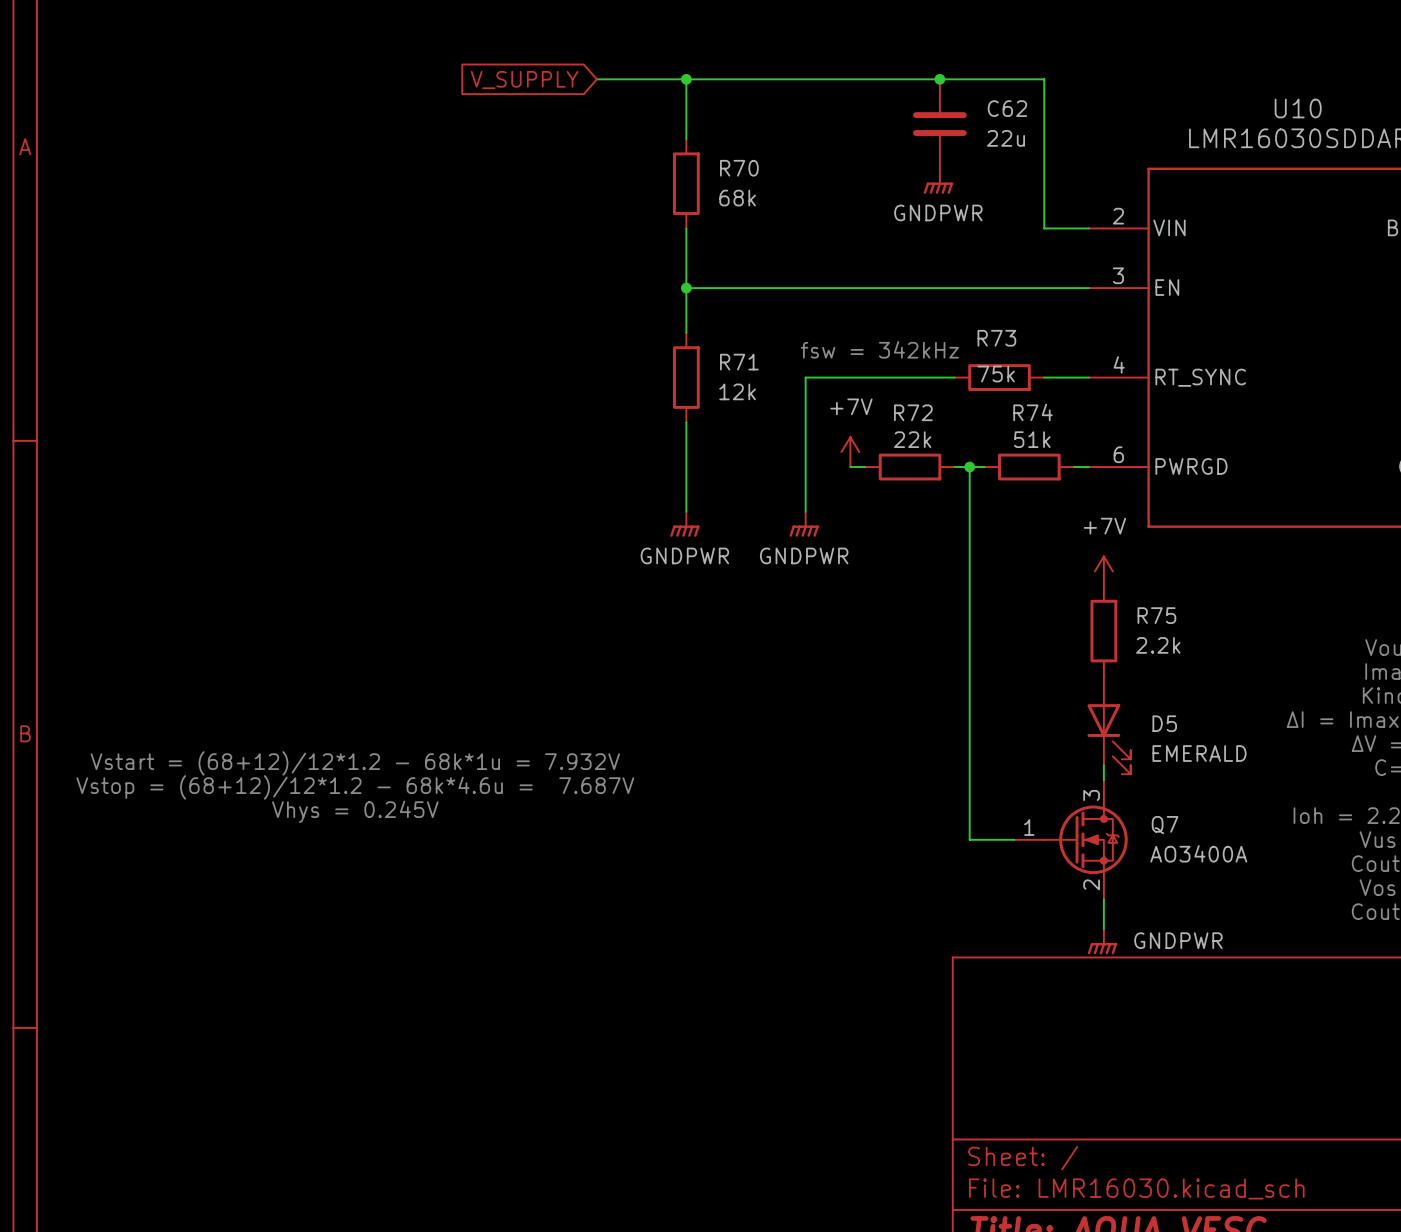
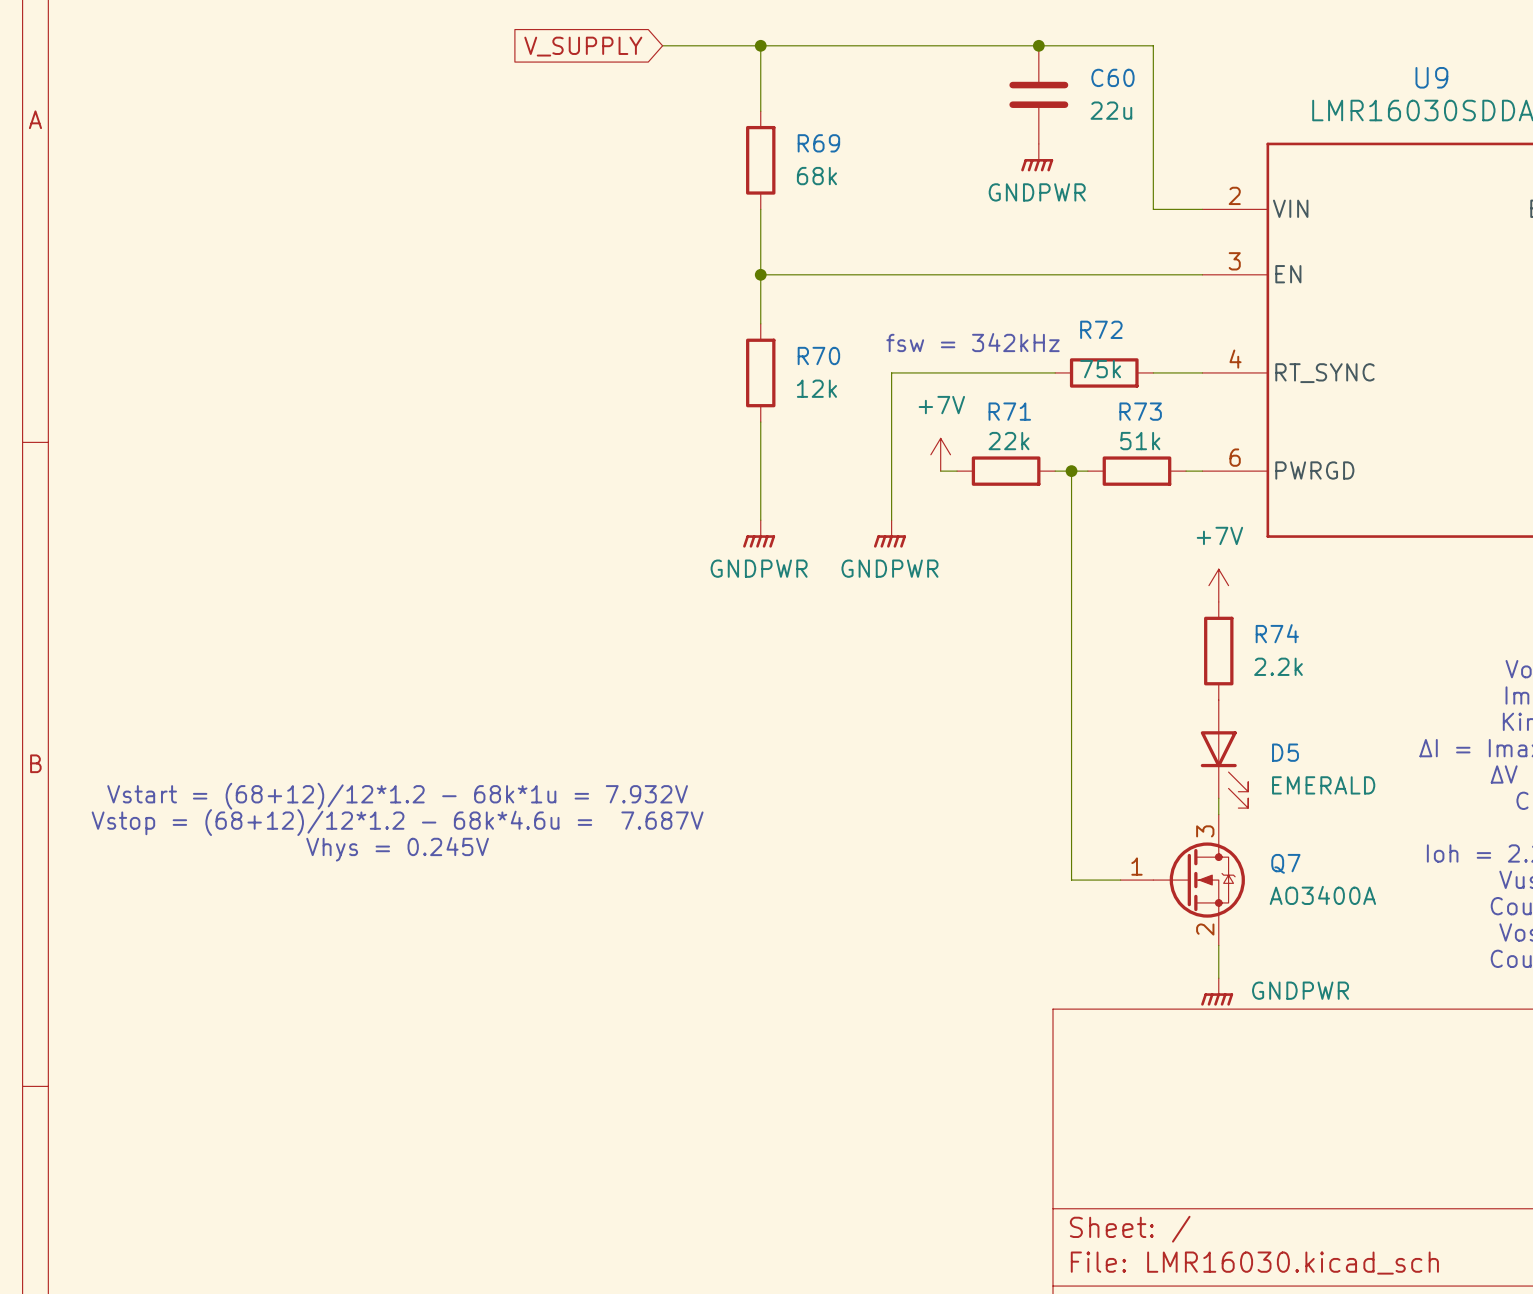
C62 name: C62 (1007, 108) -> C60 (1112, 77)
U10 name: U10 (1298, 108) -> U9 (1431, 77)
R70 name: R70 (739, 168) -> R69 (818, 143)
R73 name: R73 (996, 338) -> R72 (1101, 329)
R71 name: R71 (739, 362) -> R70 (818, 355)
R72 name: R72 (913, 412) -> R71 (1009, 411)
R74 name: R74 (1033, 412) -> R73 (1140, 411)
R75 name: R75 (1156, 615) -> R74 (1277, 633)

